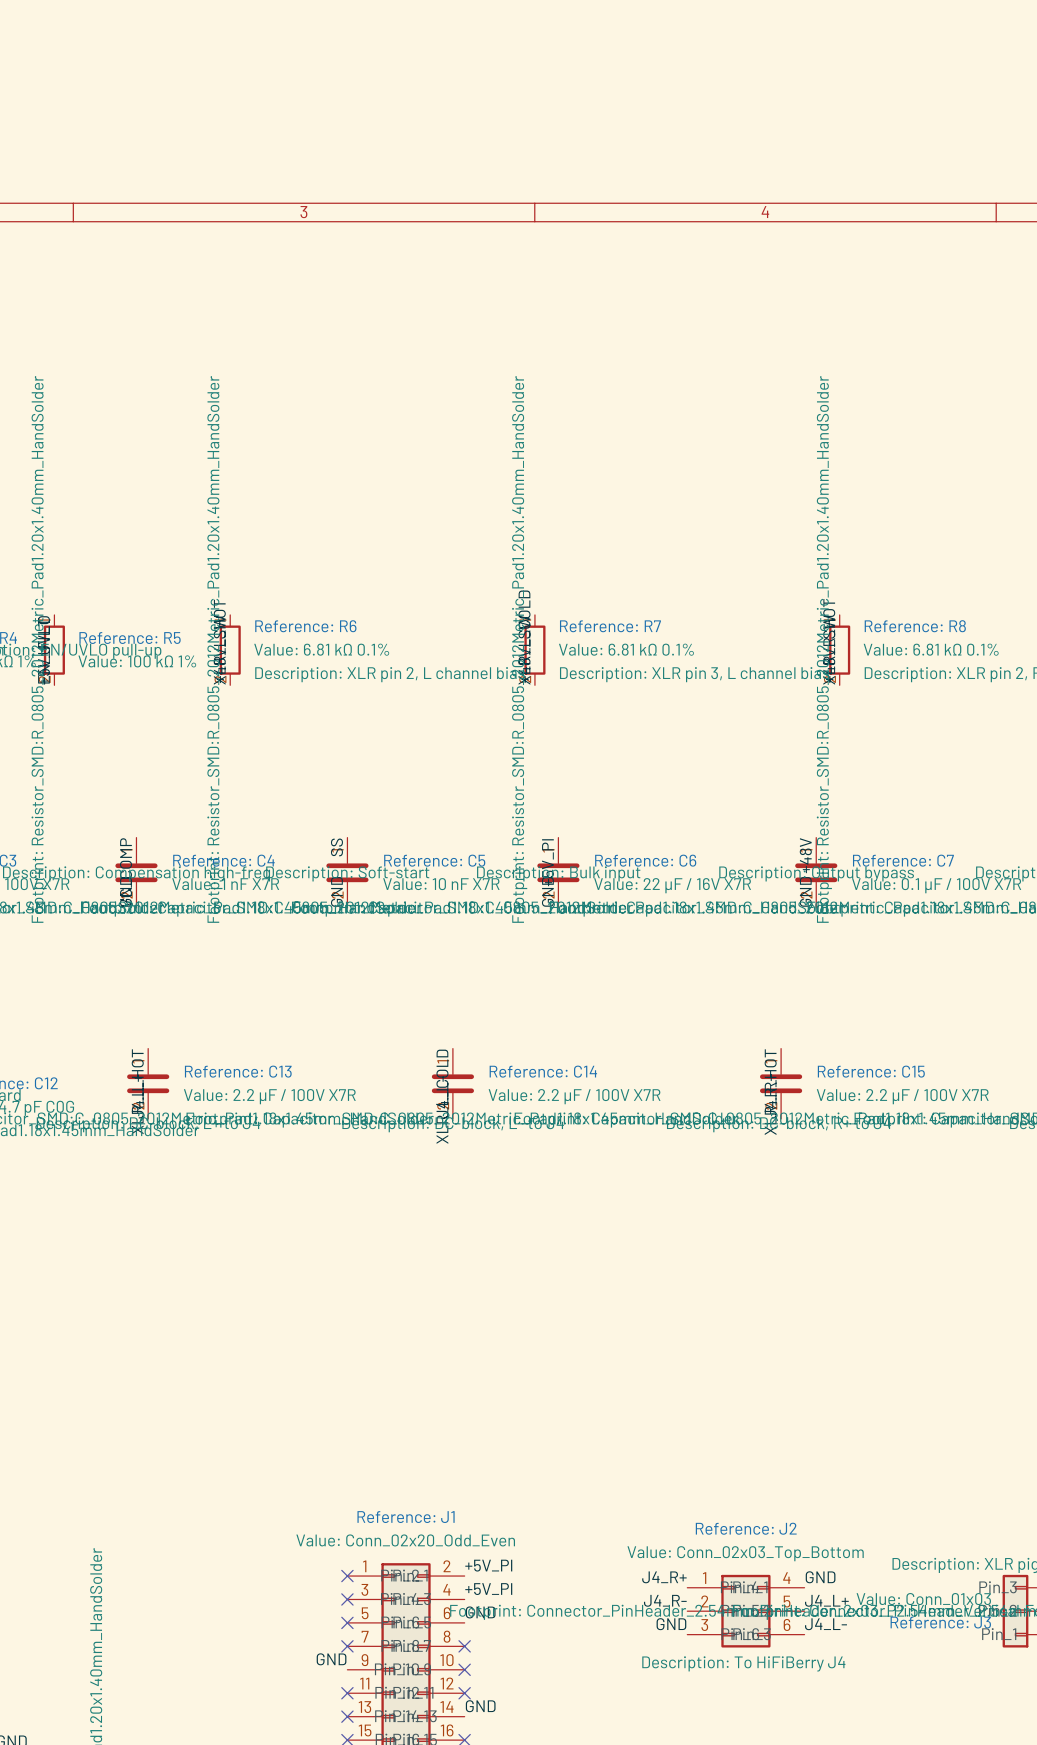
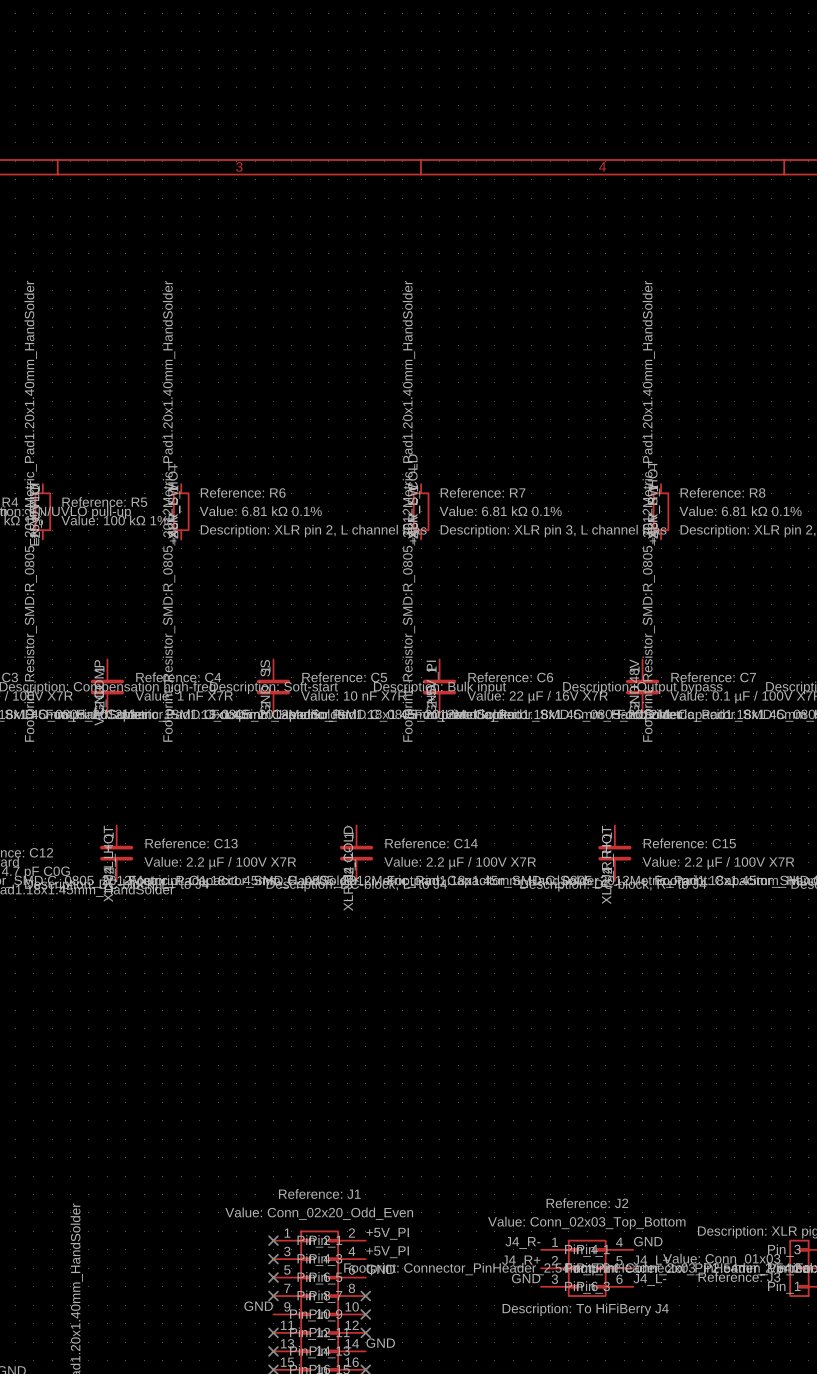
label: J4_R+ (664, 1577) -> J4_R- (522, 1242)
label: J4_R- (665, 1600) -> J4_R+ (521, 1261)

